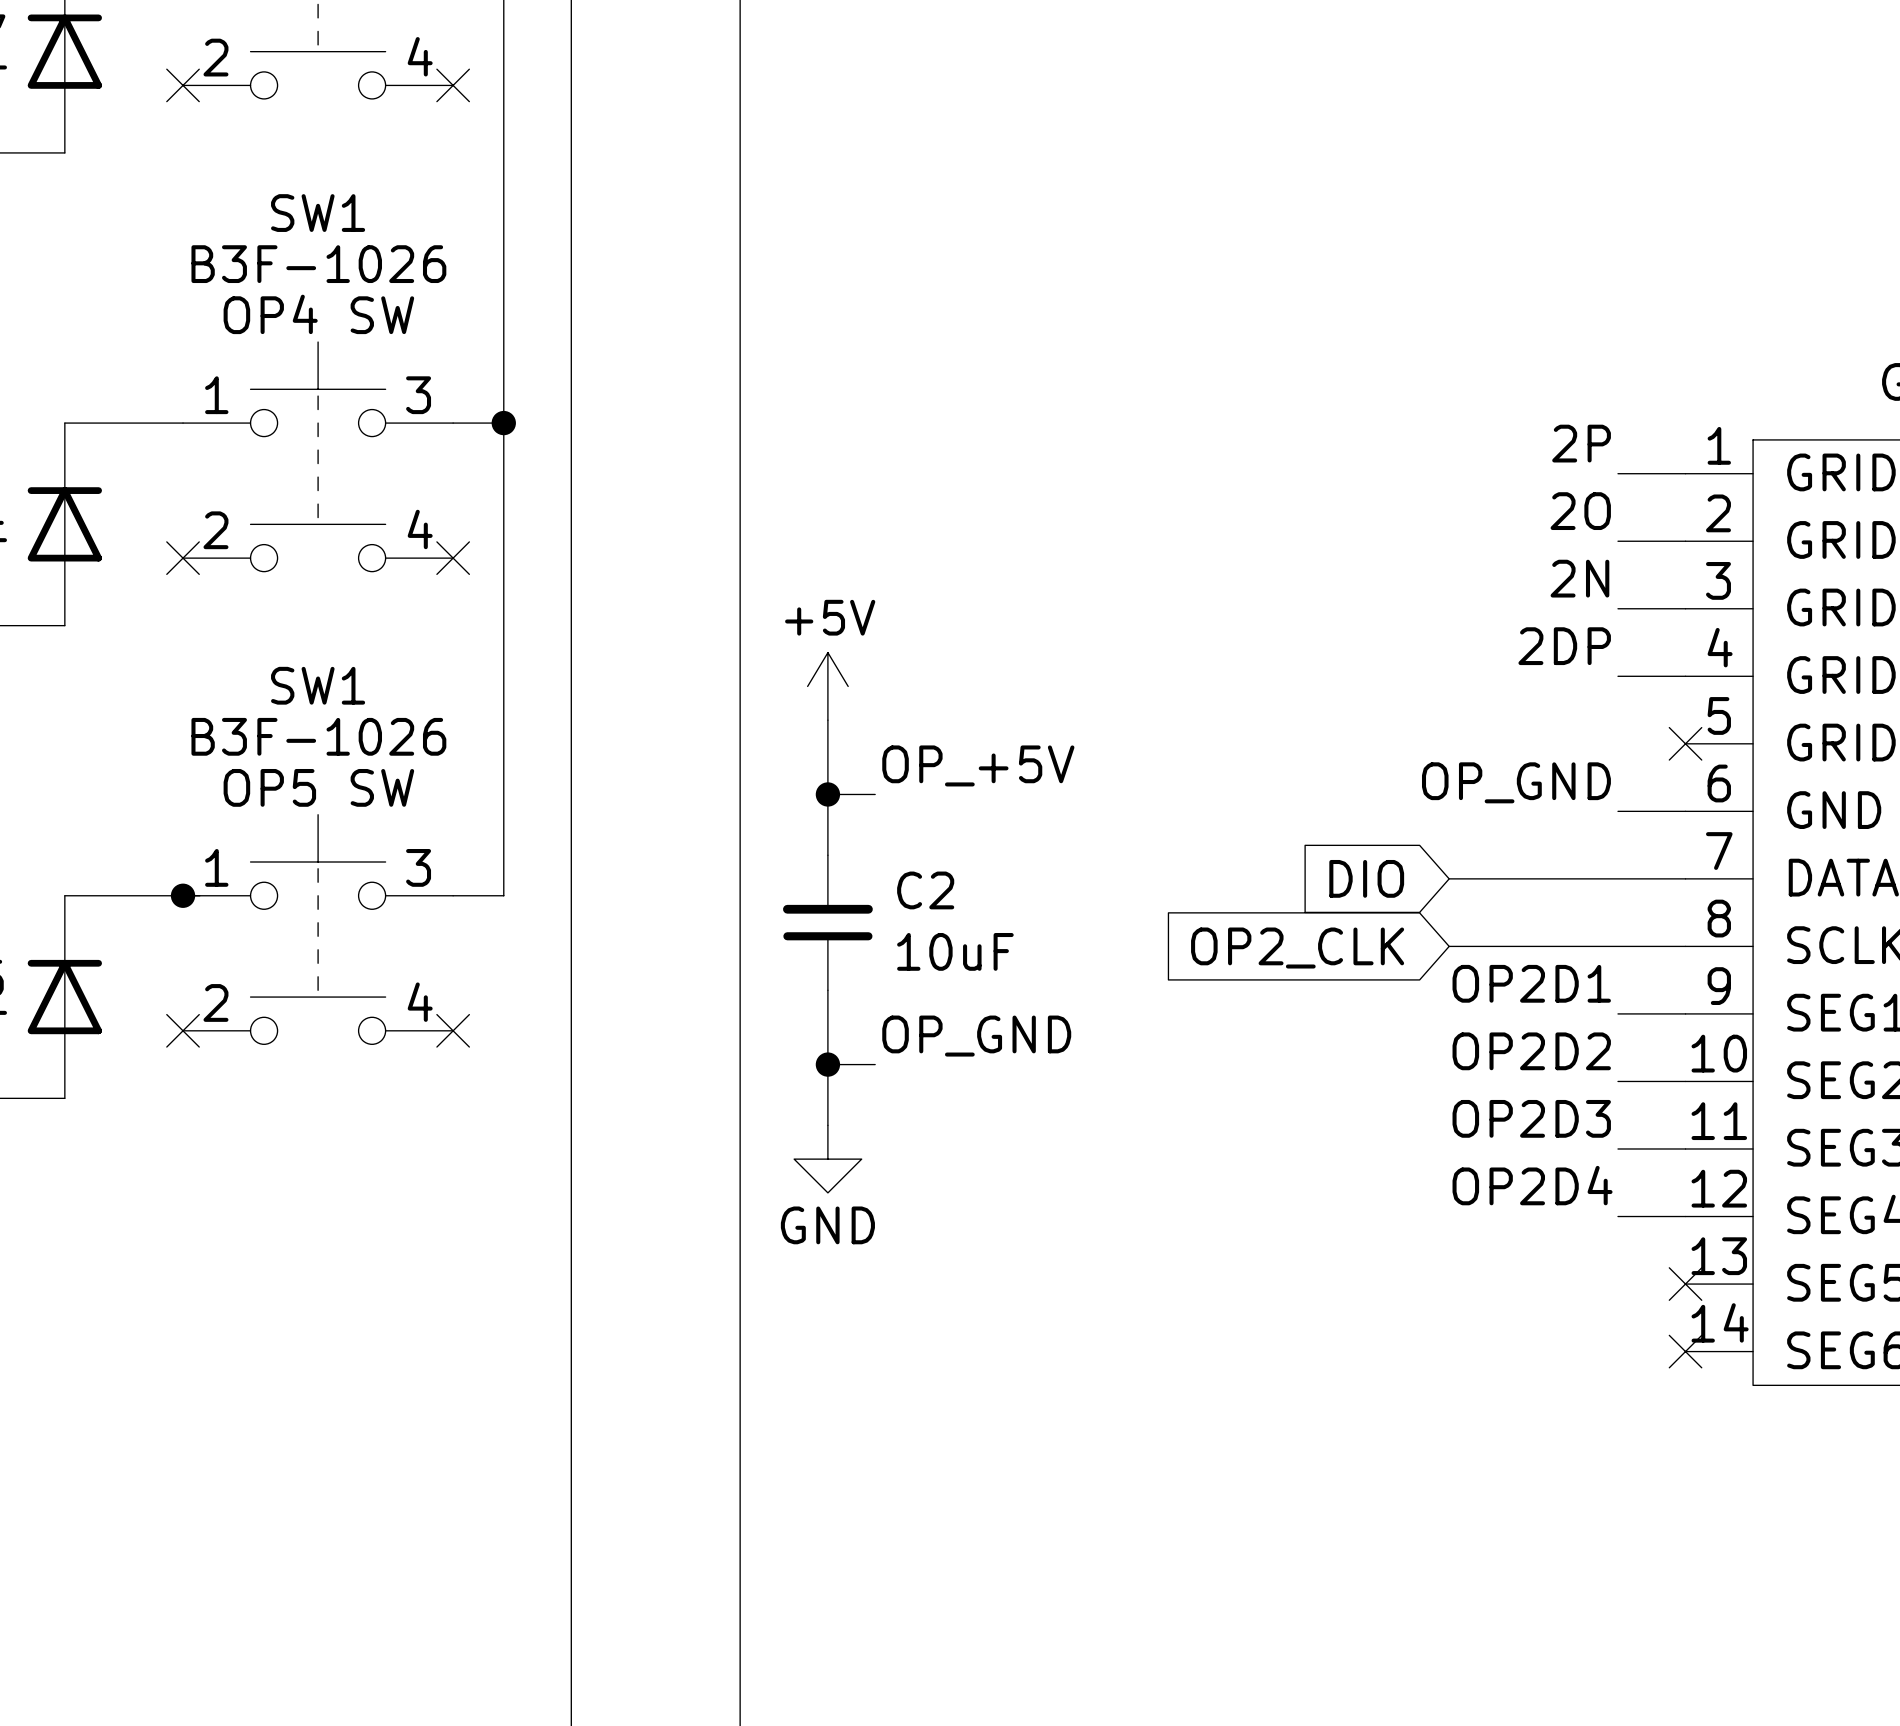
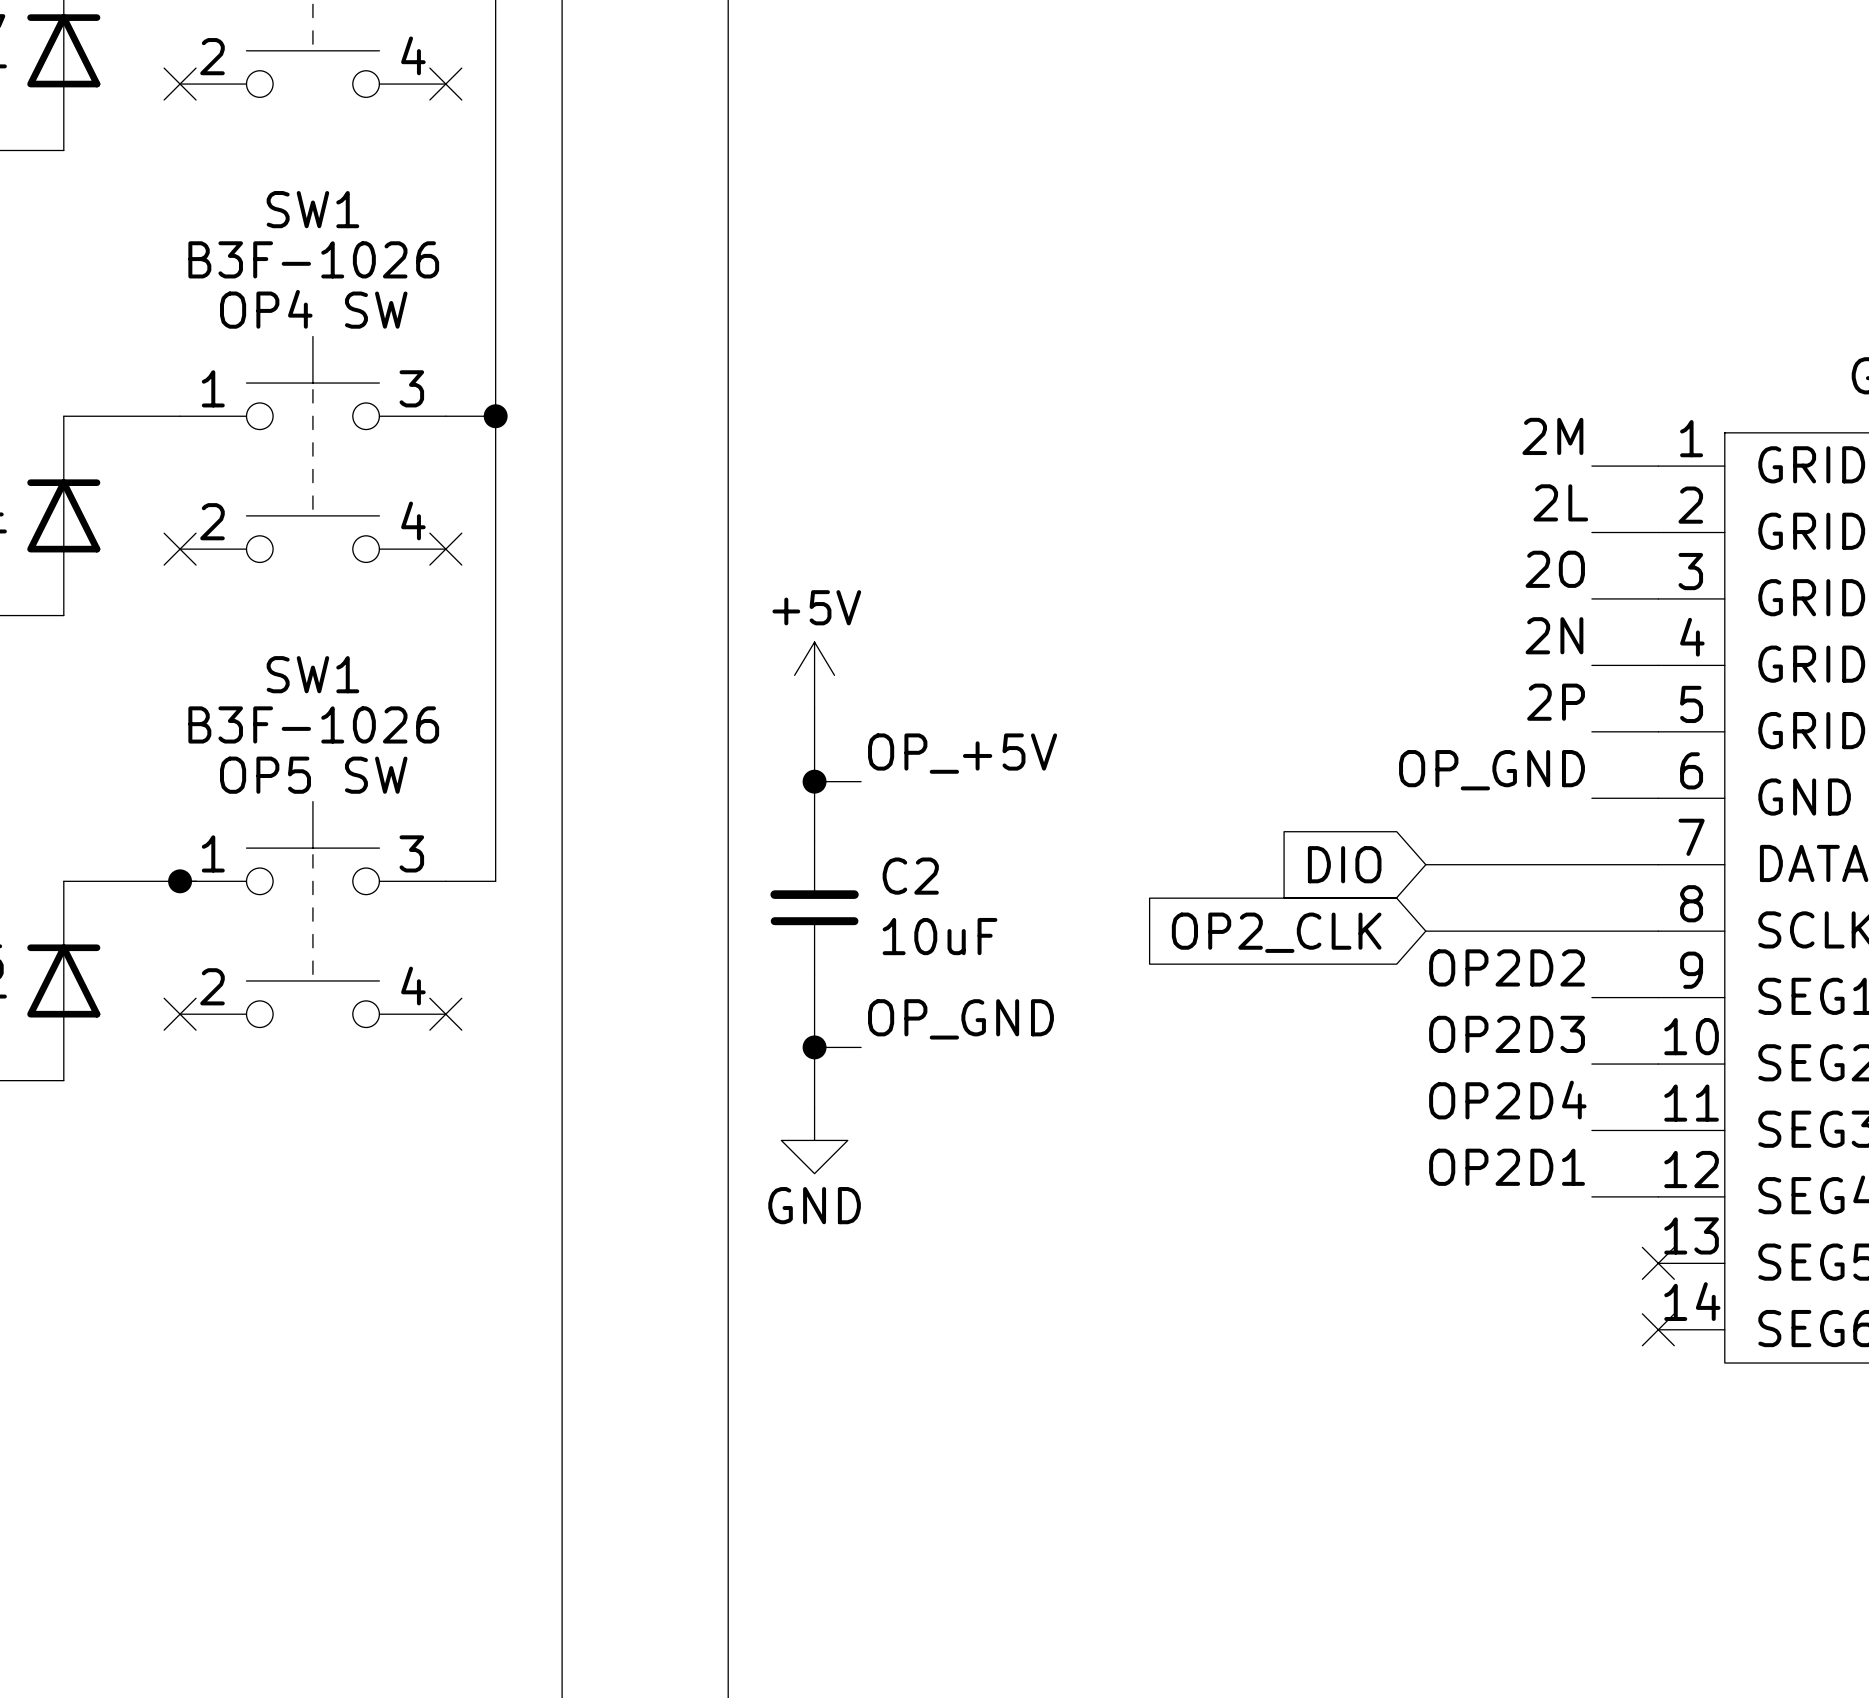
label: 2P (1581, 443) -> 2M (1552, 436)
label: 2O (1580, 511) -> 2L (1560, 502)
label: 2N (1579, 578) -> 2O (1555, 569)
label: 2DP (1564, 646) -> 2N (1554, 635)
label: none -> 2P (1556, 702)
wire: none -> (1591, 731) (1658, 731)
no-connect mark: (1685, 743) -> none
label: OP2D1 (1531, 983) -> OP2D2 (1507, 967)
label: OP2D2 (1531, 1051) -> OP2D3 (1507, 1034)
label: OP2D3 (1531, 1118) -> OP2D4 (1507, 1100)
label: OP2D4 (1532, 1185) -> OP2D1 (1507, 1167)

